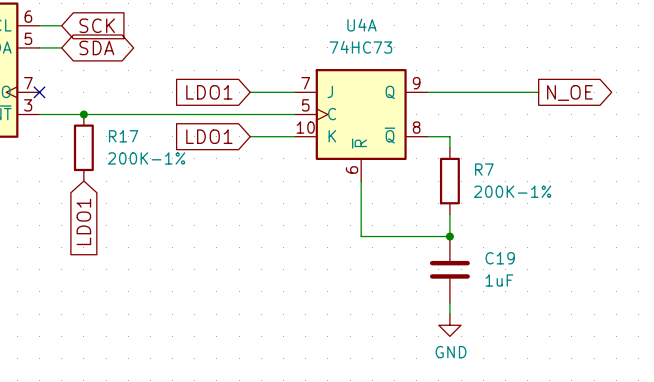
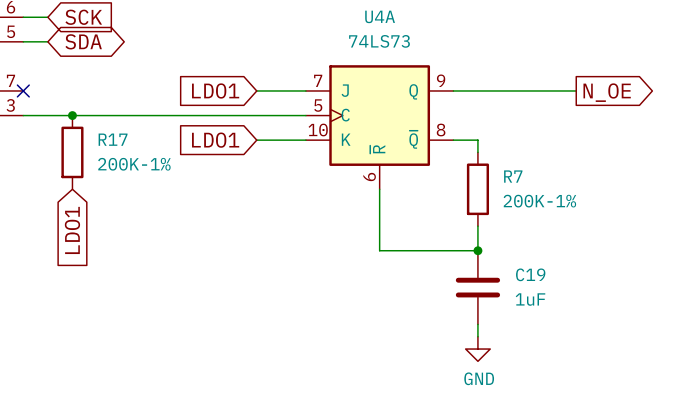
U4A value: 74HC73 (360, 47) -> 74LS73 (379, 41)

